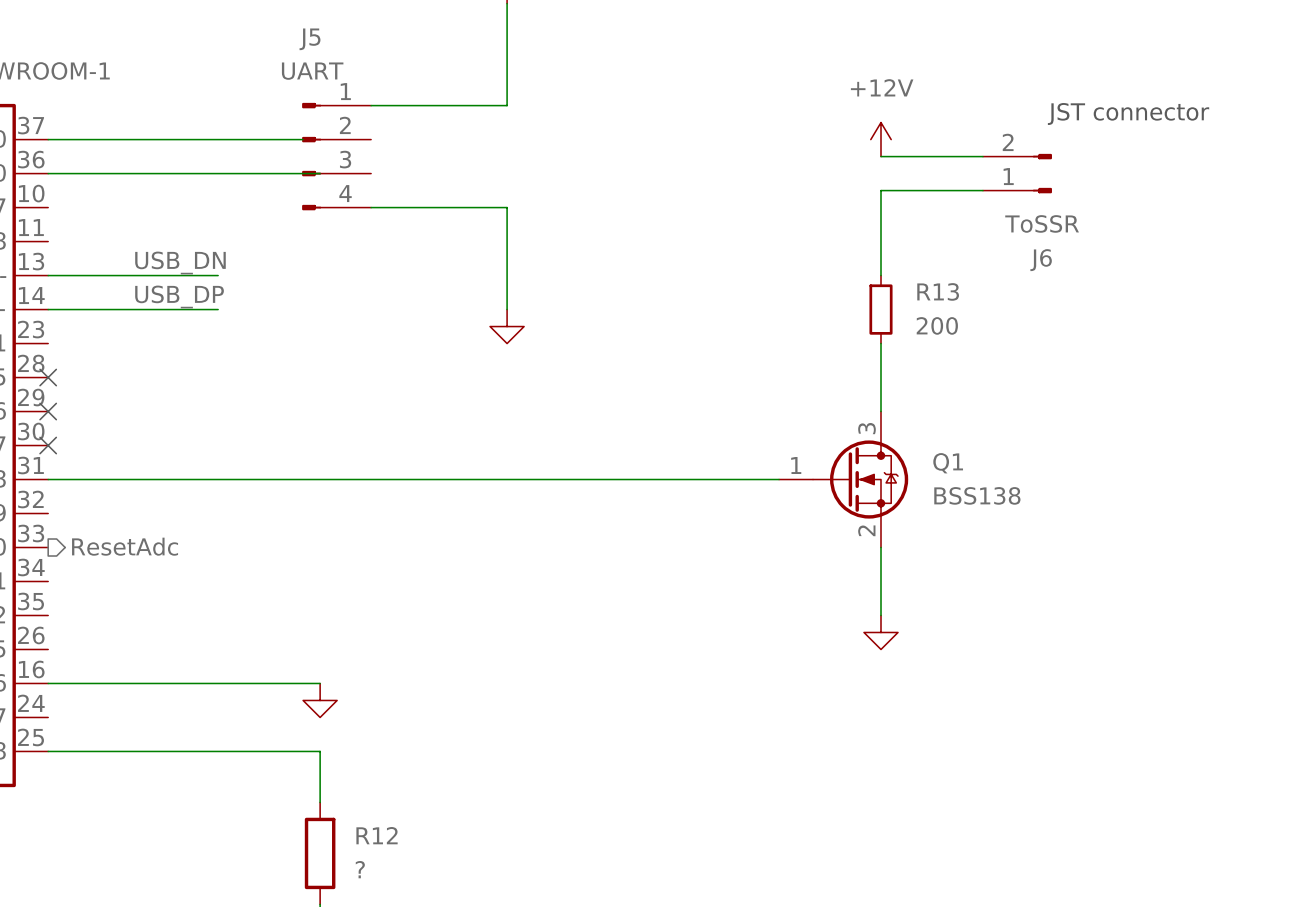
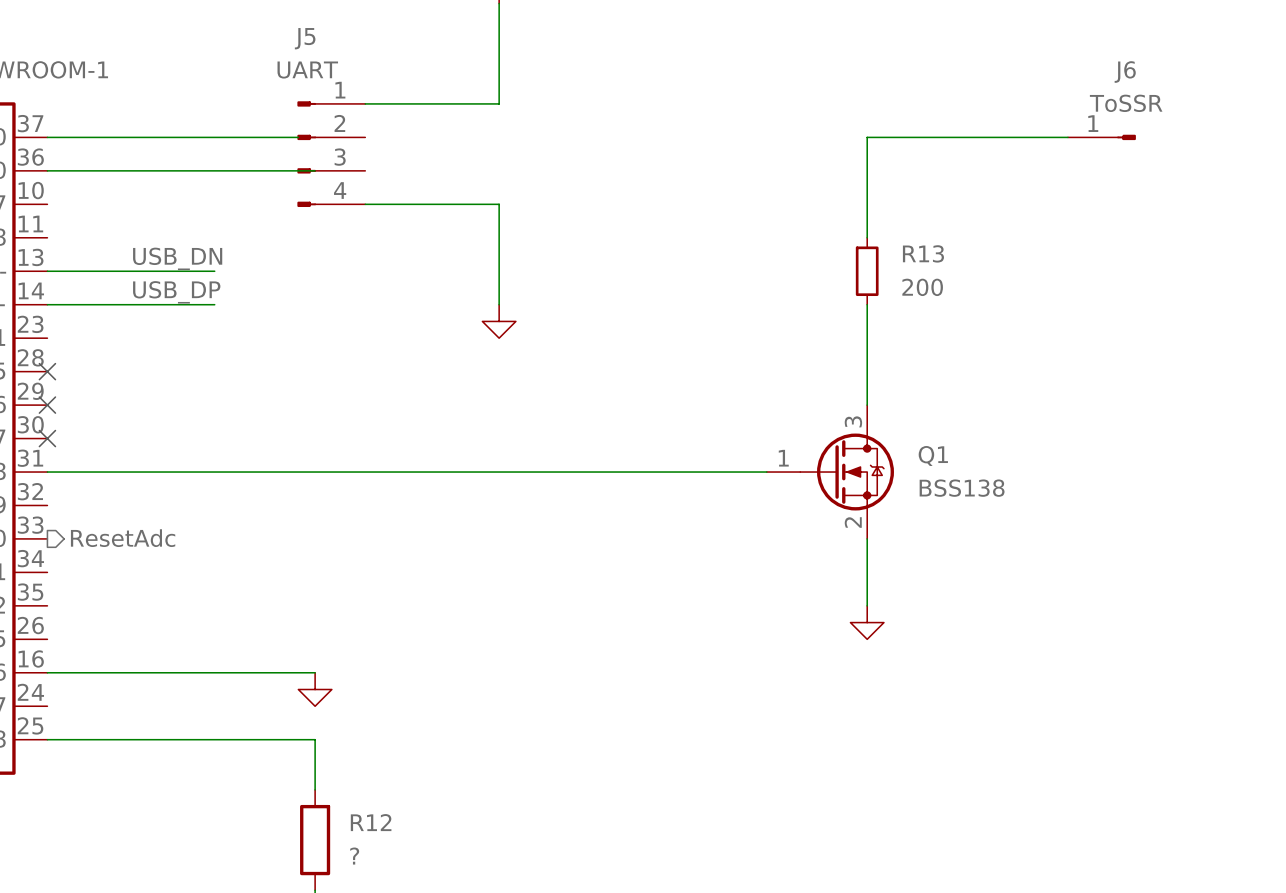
text: JST connector (1128, 114) -> none
power symbol: +12V (881, 139) -> none
J6 symbol: [982, 153, 1052, 194] -> [1067, 134, 1136, 141]
wire: (881, 156) (982, 156) -> none
wire: (881, 190) (982, 190) -> (867, 187) (867, 137) (1067, 137)
J6 value position: ToSSR (1042, 223) -> ToSSR (1126, 103)
wire: (881, 241) (881, 275) -> (867, 304) (867, 338)
J6 name position: J6 (1041, 260) -> J6 (1125, 72)
R13 position: (881, 309) -> (867, 271)

